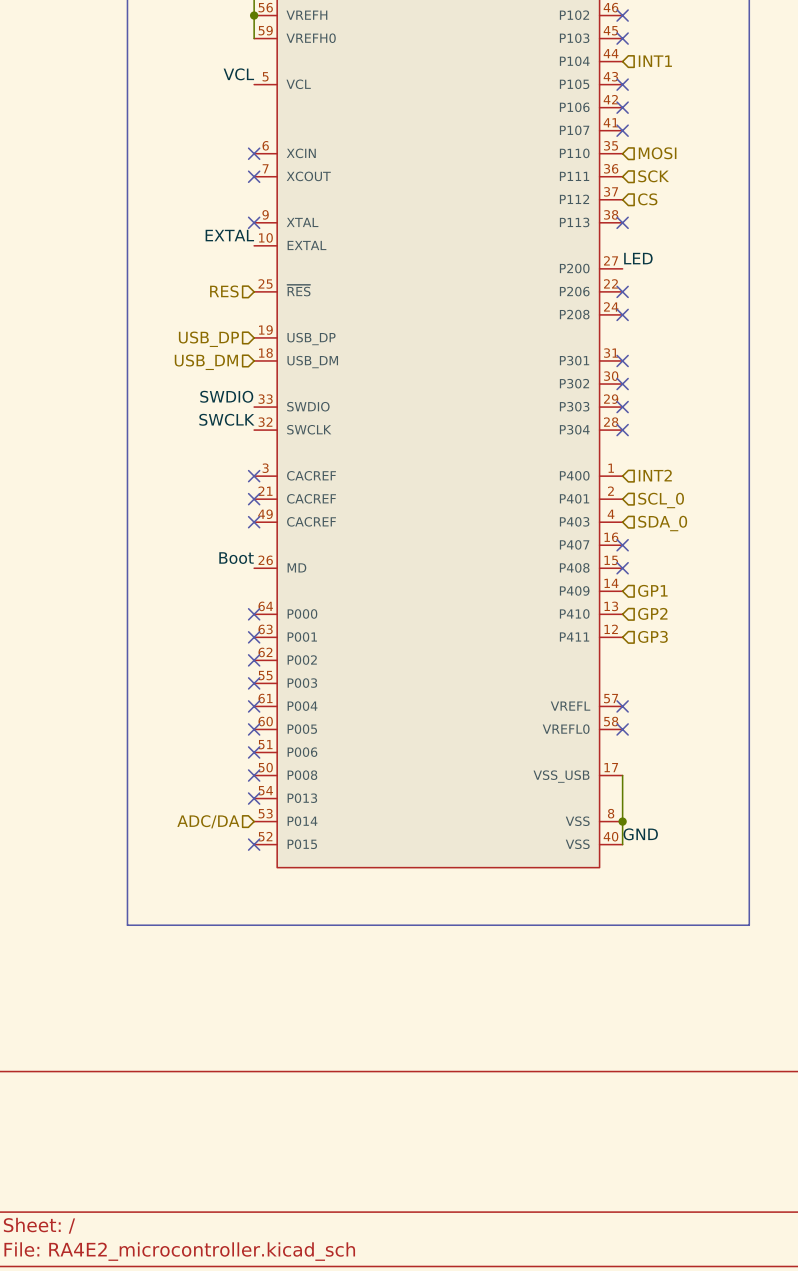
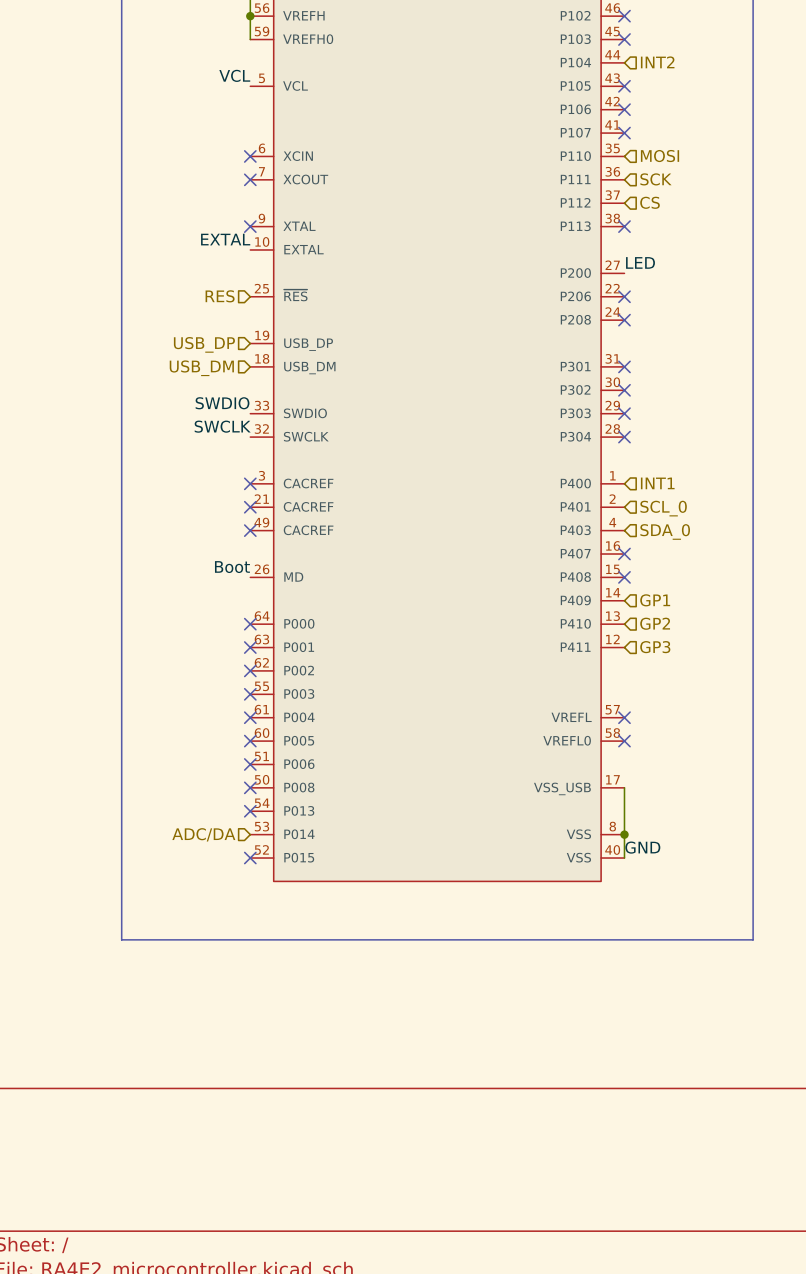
hierarchical label: INT1 (655, 61) -> INT2 (657, 62)
hierarchical label: INT2 (655, 475) -> INT1 (657, 483)

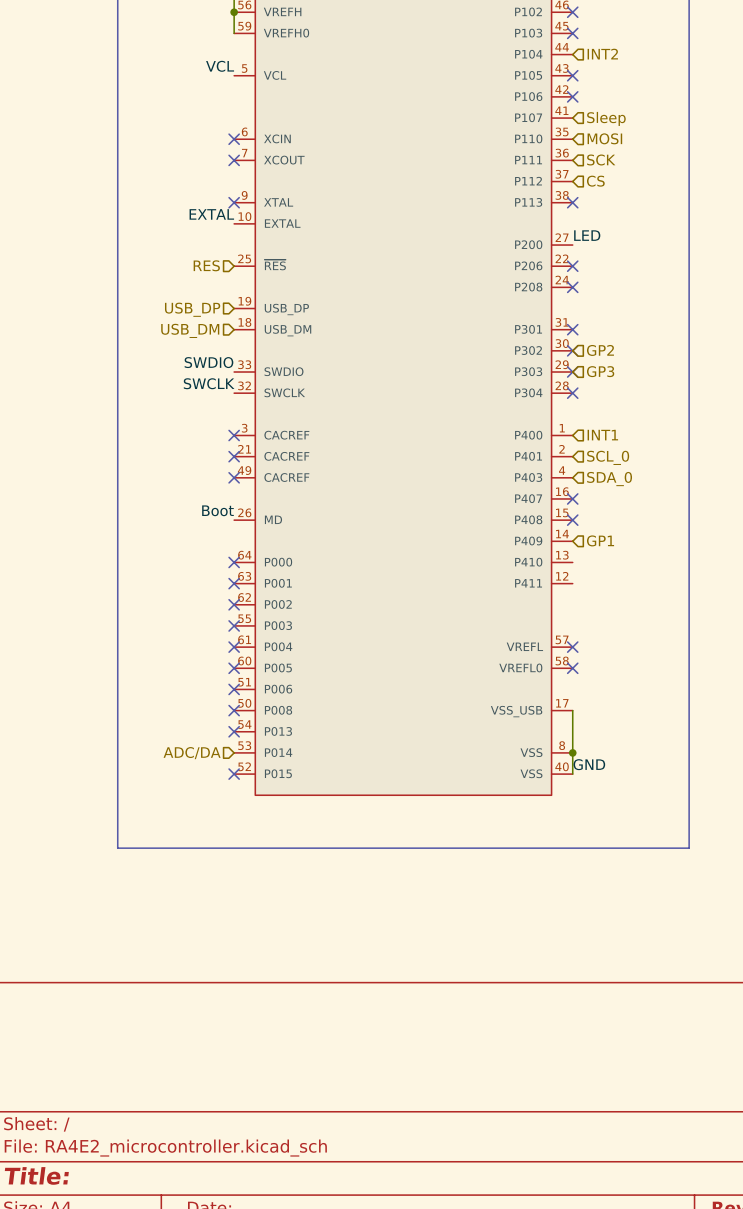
no-connect mark: (624, 133) -> none
hierarchical label: none -> Sleep (606, 118)
hierarchical label: none -> GP2 (600, 350)
hierarchical label: none -> GP3 (600, 371)
hierarchical label: GP2 (655, 623) -> none
hierarchical label: GP3 (655, 647) -> none

